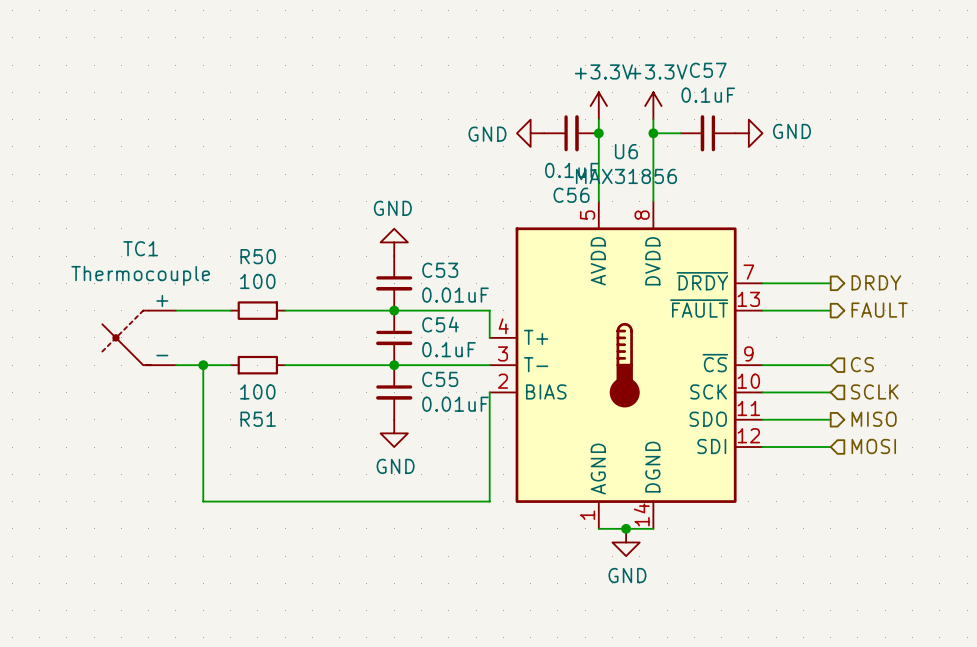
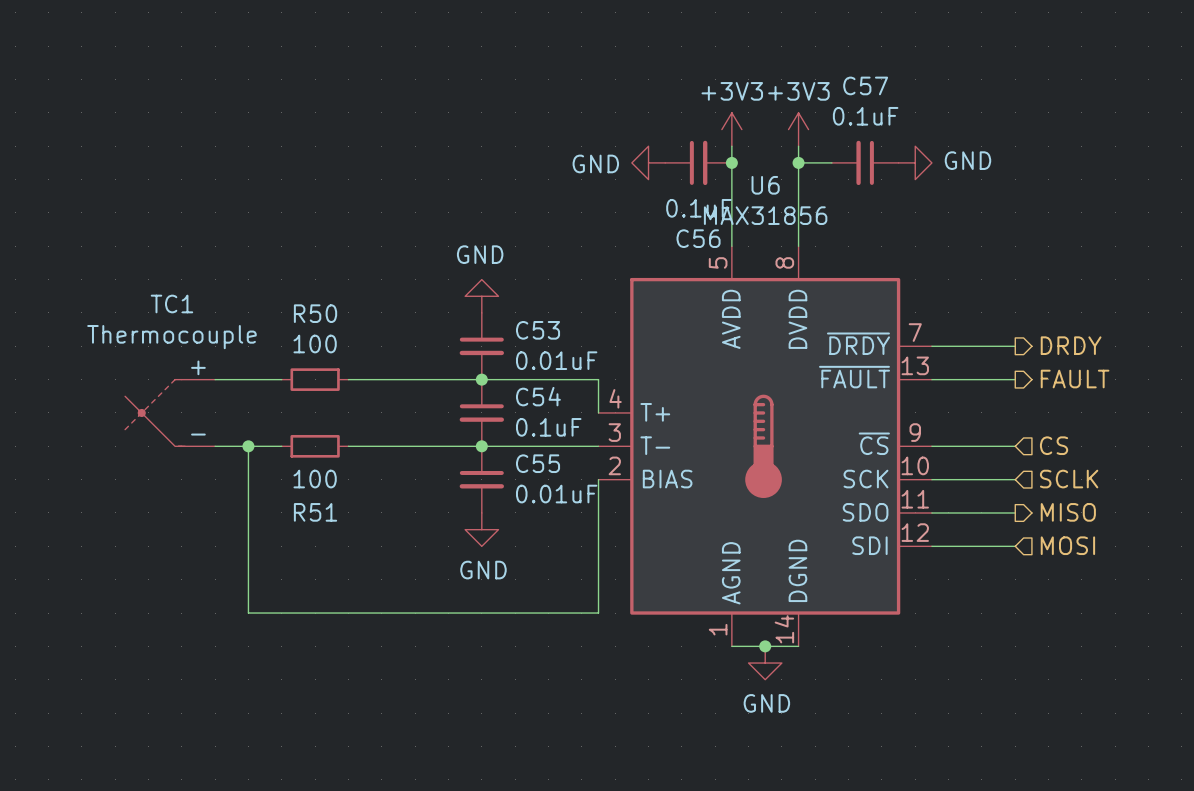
power symbol: +3.3V (598, 106) -> +3V3 (731, 129)
power symbol: +3.3V (653, 106) -> +3V3 (798, 129)

